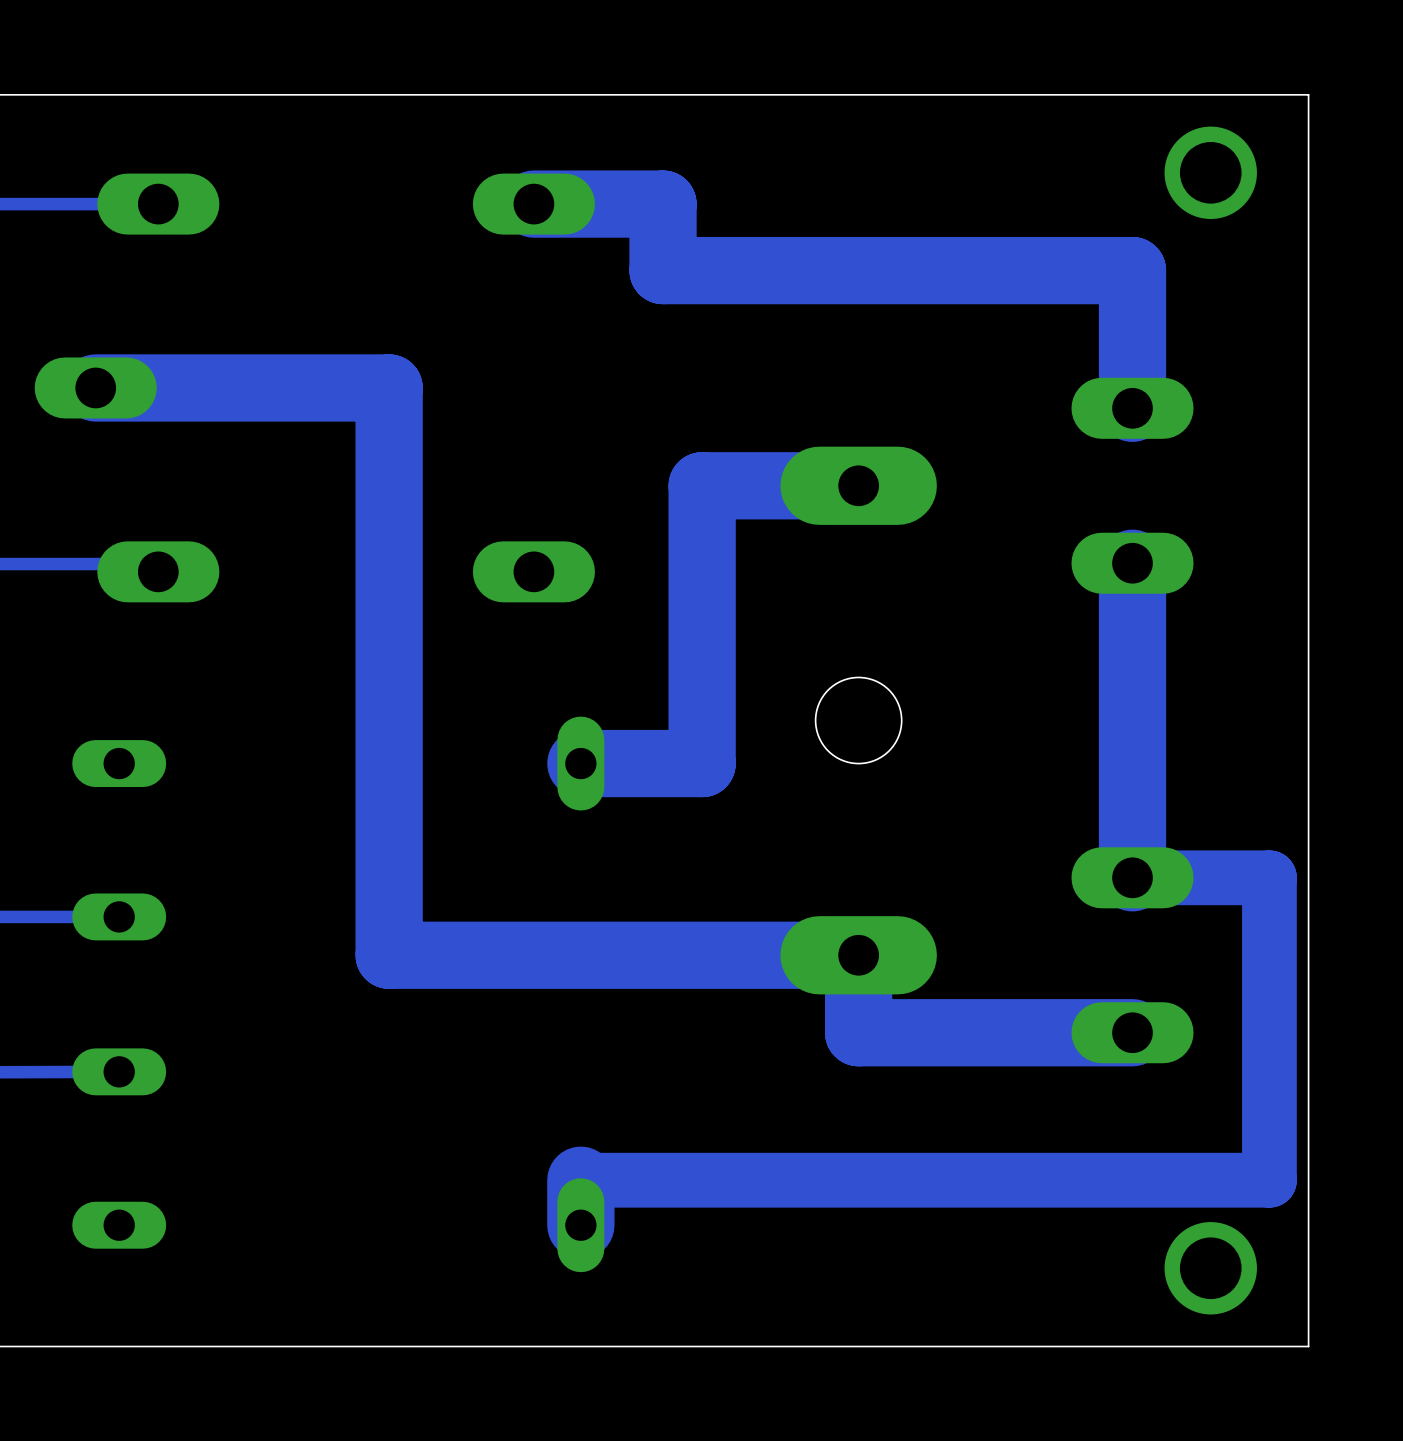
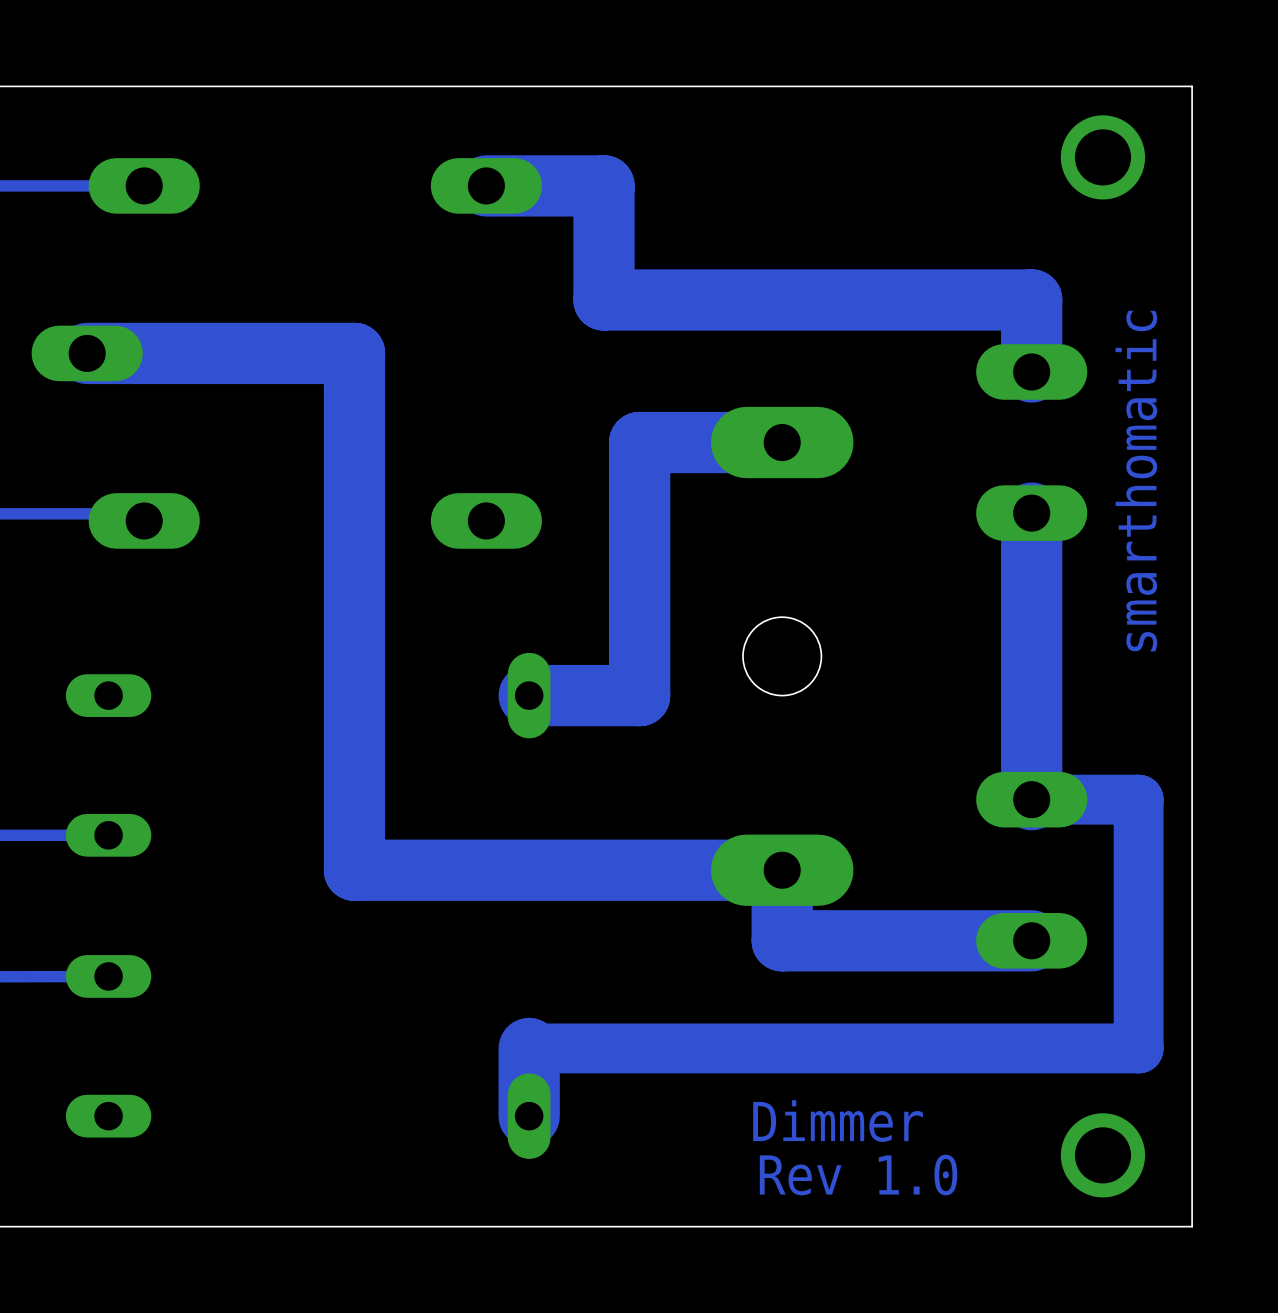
bottom track: (663, 270) (1132, 270) (1132, 329) -> (604, 246) (604, 299) (1031, 299)
text: none -> smarthomatic (1136, 481)
bottom track: (1249, 877) (1269, 877) (1269, 1180) (580, 1180) -> (1138, 799) (1138, 1048) (529, 1048) (529, 1075)
text: none -> Dimmer (838, 1121)
text: none -> Rev 1.0 (858, 1175)

